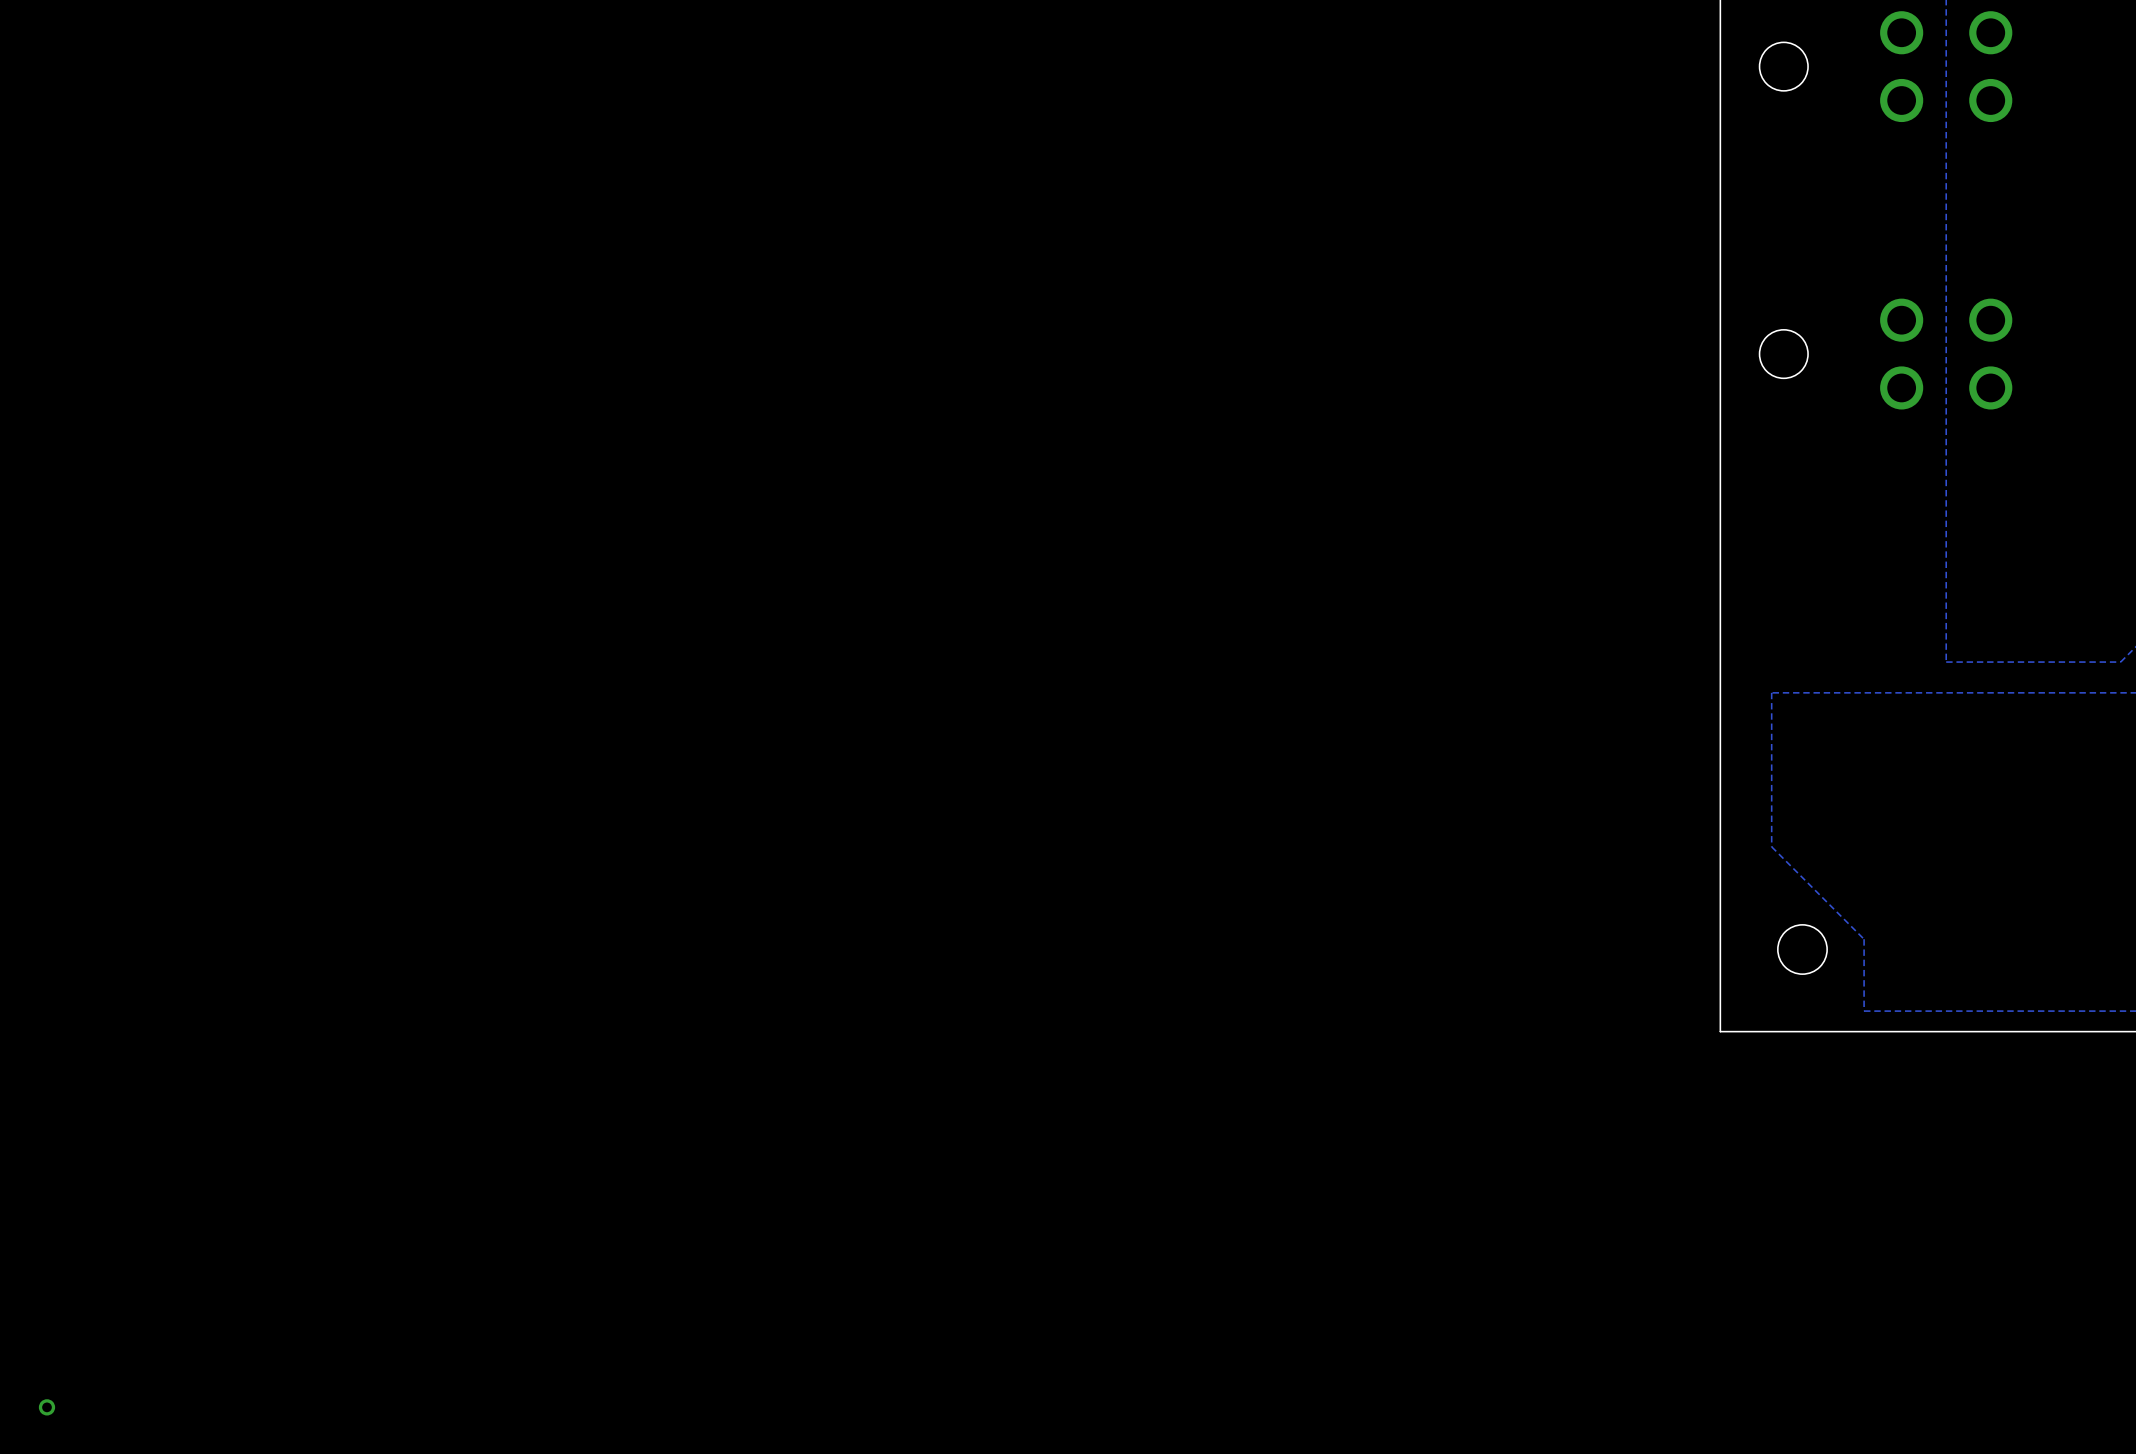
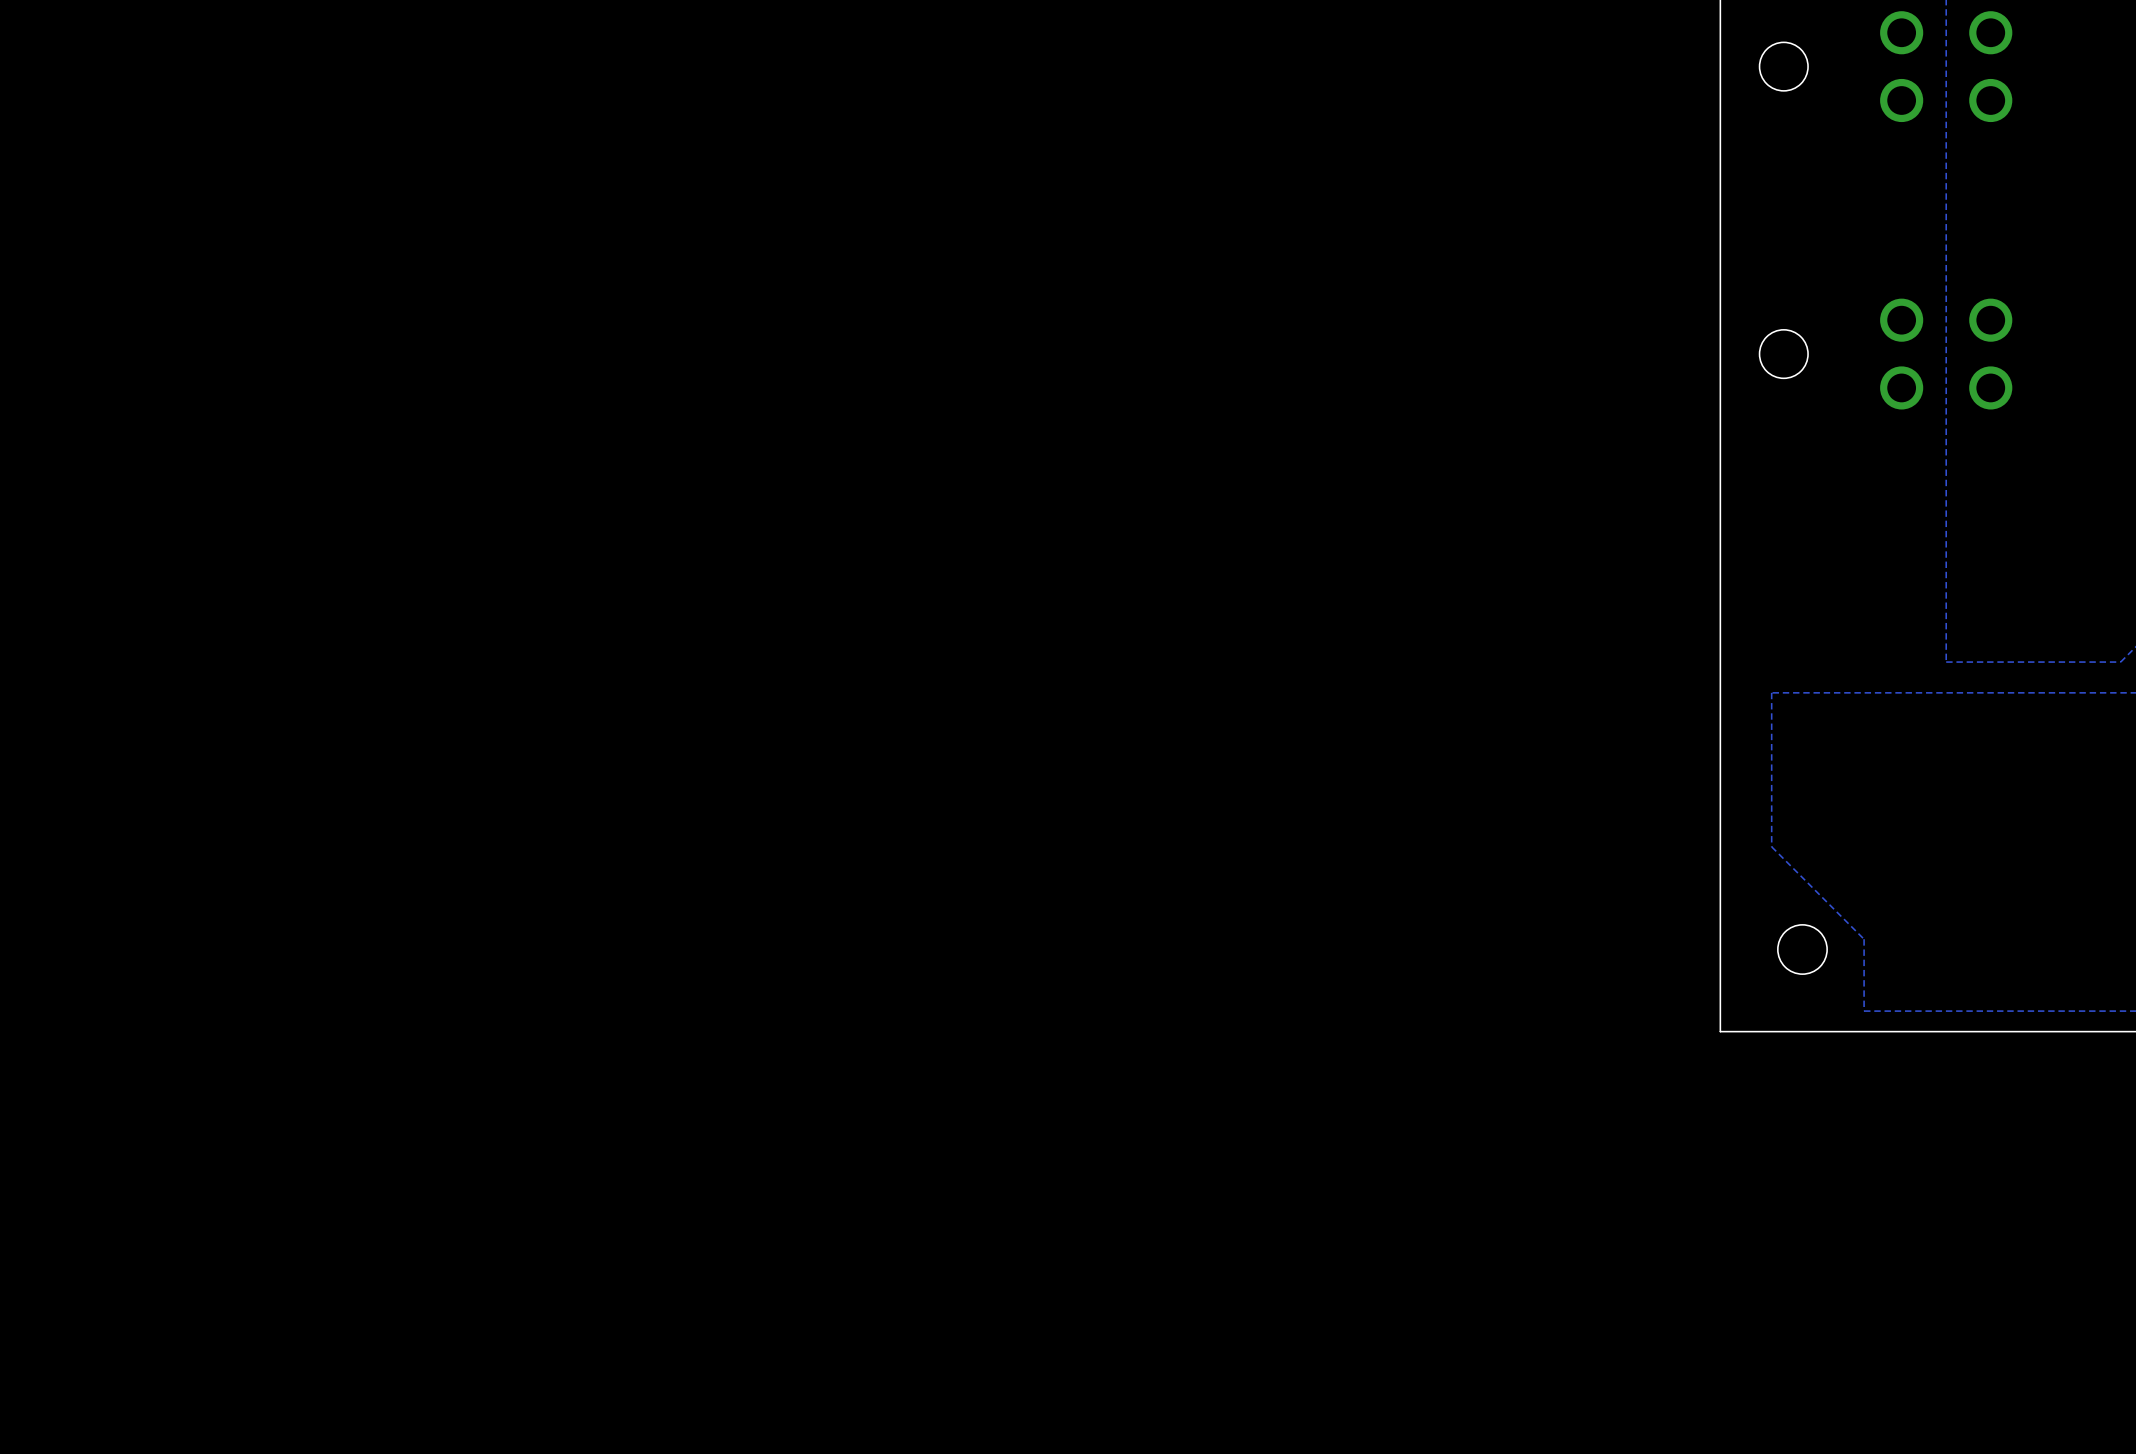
via: (46, 1407) -> none

